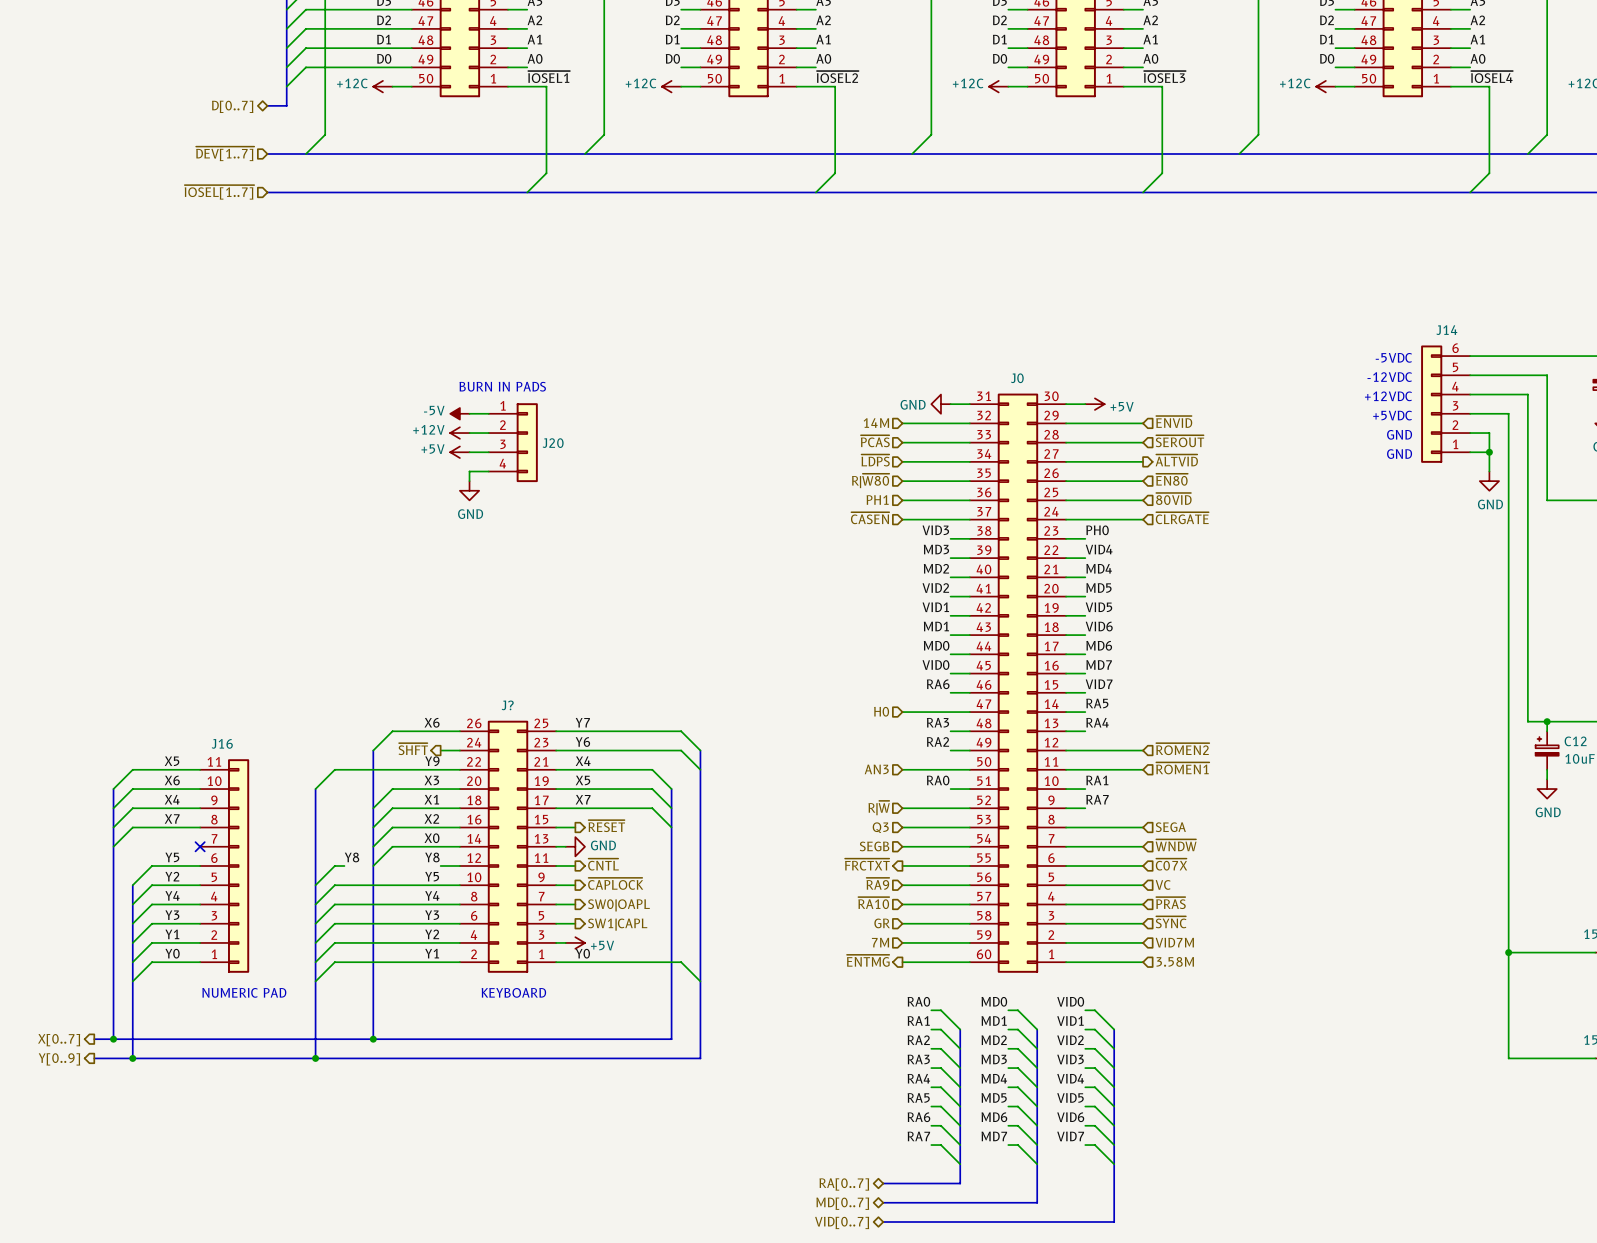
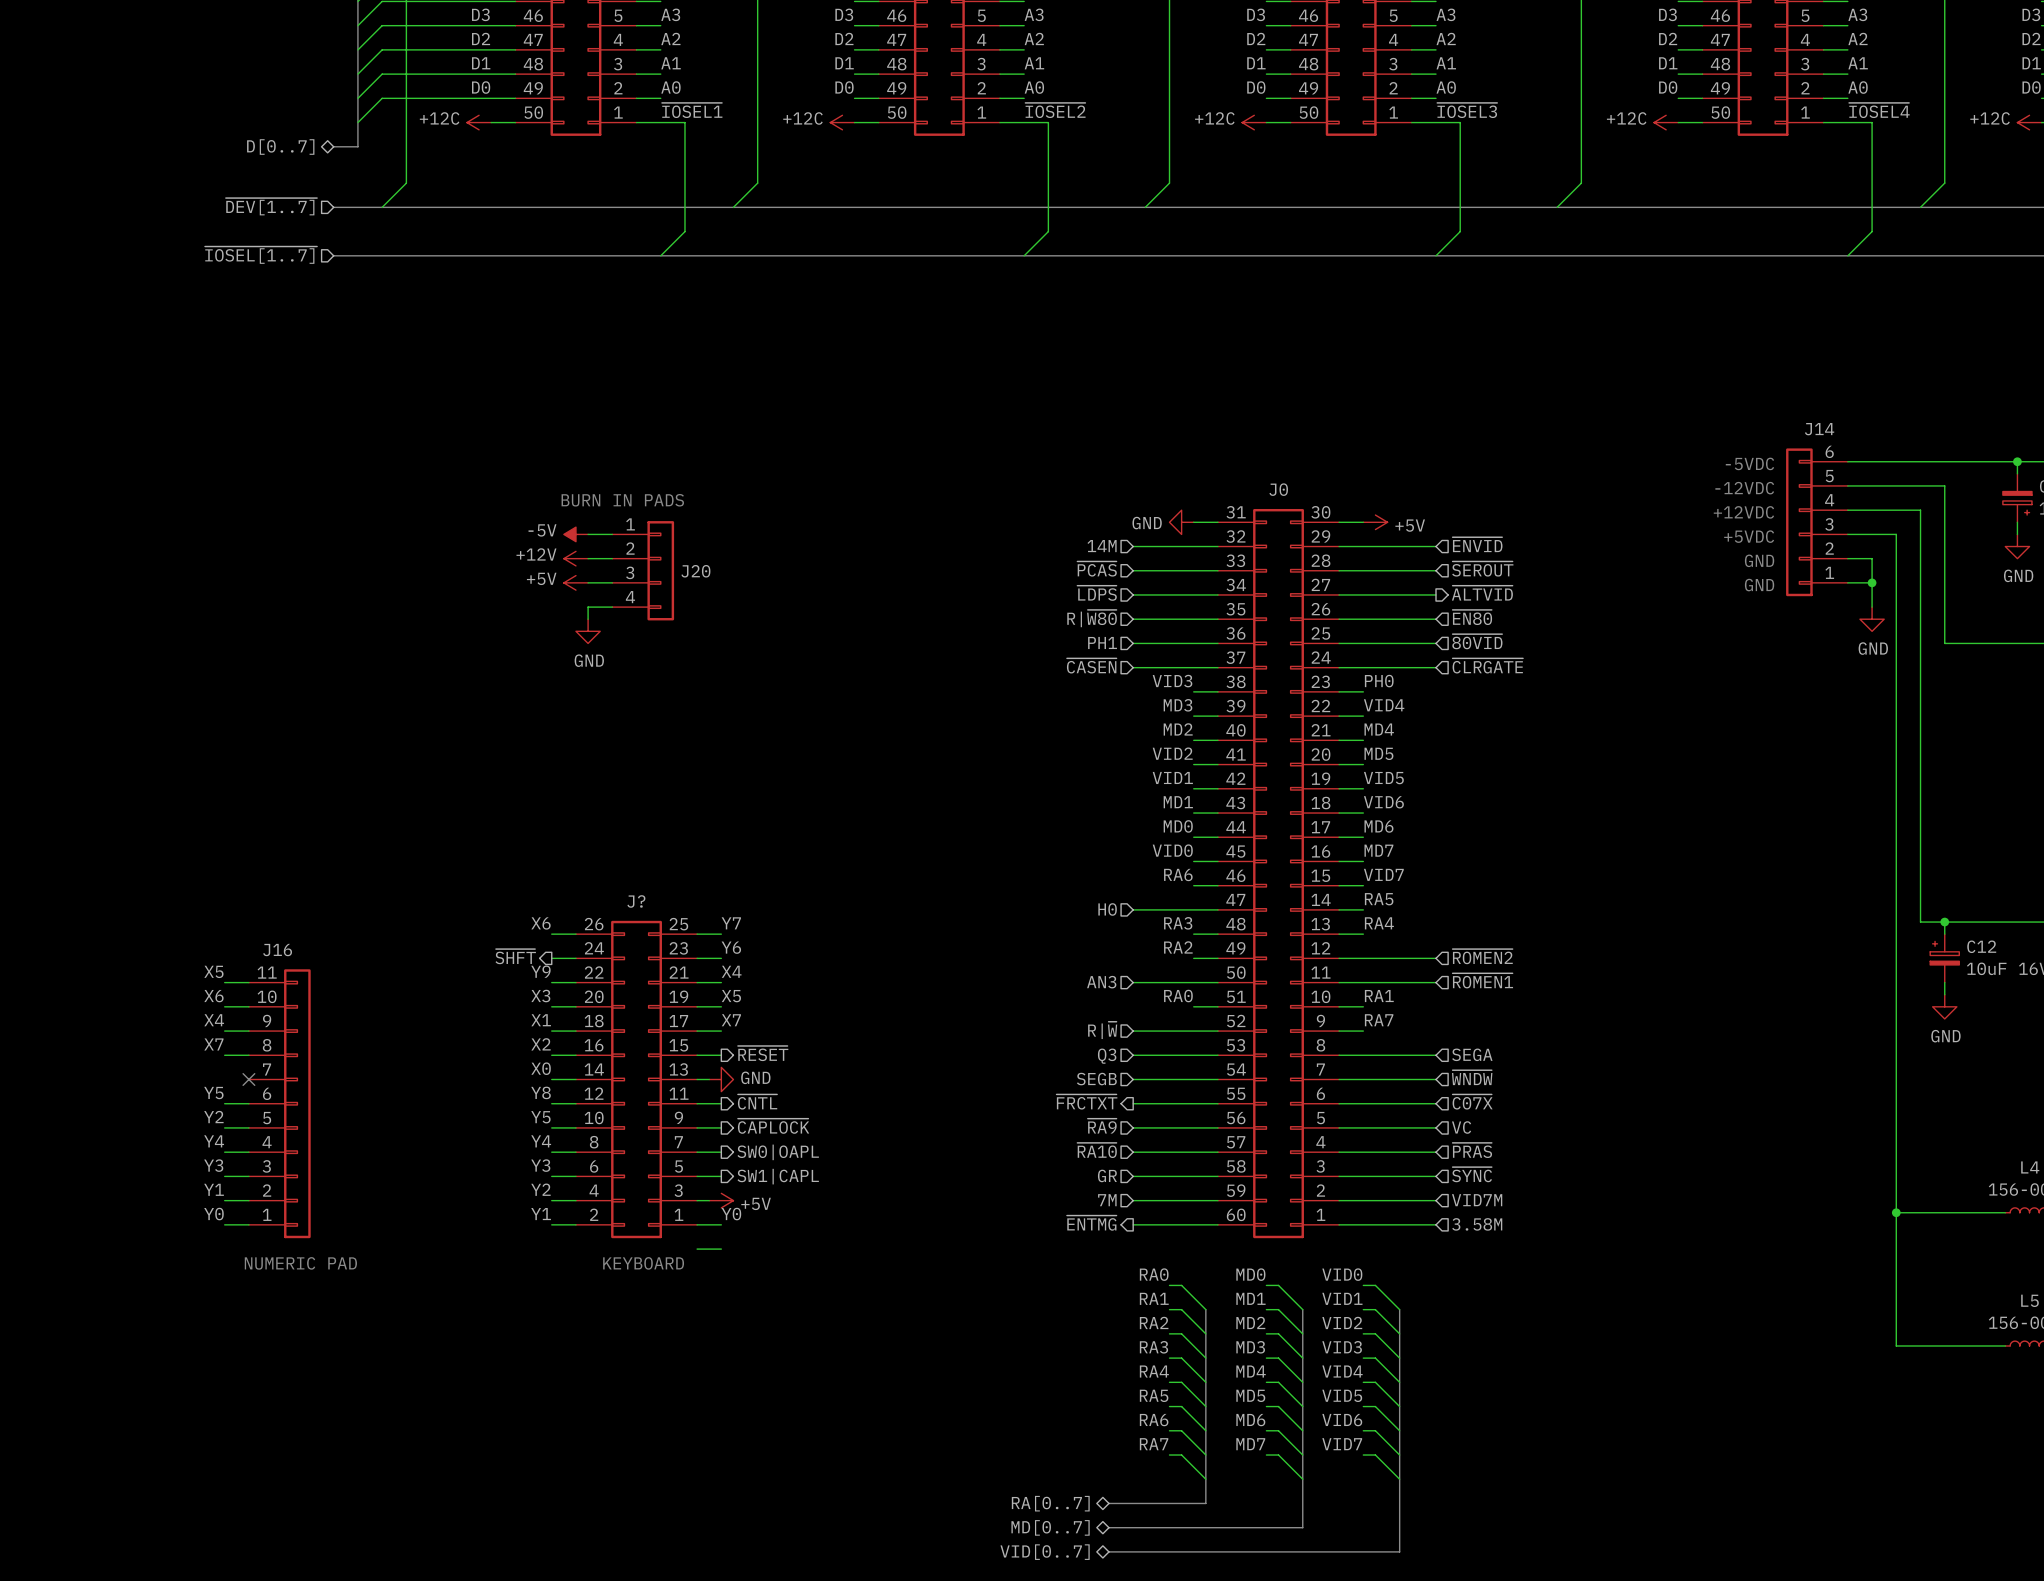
wire: (440, 731) (392, 731) (373, 750) -> none
wire: (575, 731) (681, 731) (700, 750) -> none
bus: (373, 750) (373, 1039) -> none
wire: (575, 750) (681, 750) (700, 769) -> none
bus: (700, 750) (700, 1058) (94, 1058) -> none
wire: (180, 769) (132, 769) (113, 789) -> none
wire: (440, 769) (334, 769) (315, 789) -> none
wire: (575, 769) (652, 769) (671, 789) -> none
bus: (113, 789) (113, 1039) -> none
wire: (180, 789) (132, 789) (113, 808) -> none
bus: (315, 789) (315, 1058) -> none
wire: (440, 789) (392, 789) (373, 808) -> none
wire: (575, 789) (652, 789) (671, 808) -> none
bus: (671, 789) (671, 1039) (94, 1039) -> none
wire: (180, 808) (132, 808) (113, 827) -> none
wire: (440, 808) (392, 808) (373, 827) -> none
wire: (575, 808) (652, 808) (671, 827) -> none
wire: (180, 827) (132, 827) (113, 846) -> none
wire: (440, 827) (392, 827) (373, 846) -> none
wire: (440, 846) (392, 846) (373, 865) -> none
label: Y8 (352, 857) -> none
wire: (180, 865) (152, 865) (132, 885) -> none
wire: (344, 865) (334, 865) (315, 885) -> none
bus: (132, 885) (132, 1058) -> none
wire: (180, 885) (152, 885) (132, 904) -> none
wire: (440, 885) (334, 885) (315, 904) -> none
wire: (180, 904) (152, 904) (132, 923) -> none
wire: (440, 904) (334, 904) (315, 923) -> none
wire: (180, 923) (152, 923) (132, 942) -> none
wire: (440, 923) (334, 923) (315, 942) -> none
wire: (180, 942) (152, 942) (132, 962) -> none
wire: (440, 942) (334, 942) (315, 962) -> none
wire: (180, 962) (152, 962) (132, 981) -> none
wire: (440, 962) (334, 962) (315, 981) -> none
wire: (575, 962) (681, 962) (700, 981) -> none
wire: none -> (697, 1249) (721, 1249)
junction: (113, 1039) -> none
junction: (373, 1039) -> none
hierarchical label: X[0..7] (59, 1040) -> none
junction: (132, 1058) -> none
junction: (315, 1058) -> none
hierarchical label: Y[0..9] (59, 1059) -> none

